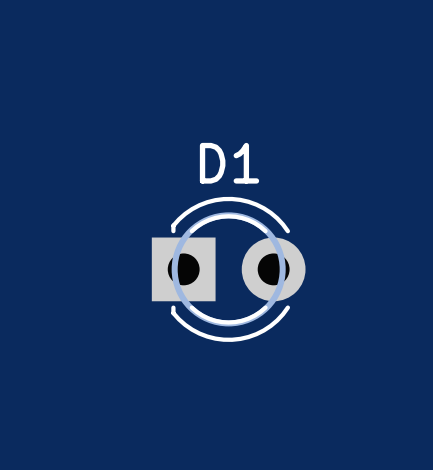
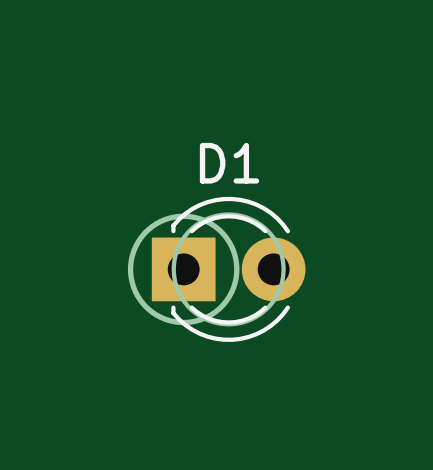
D1 footprint: [151, 196, 306, 342] -> [127, 196, 306, 342]

